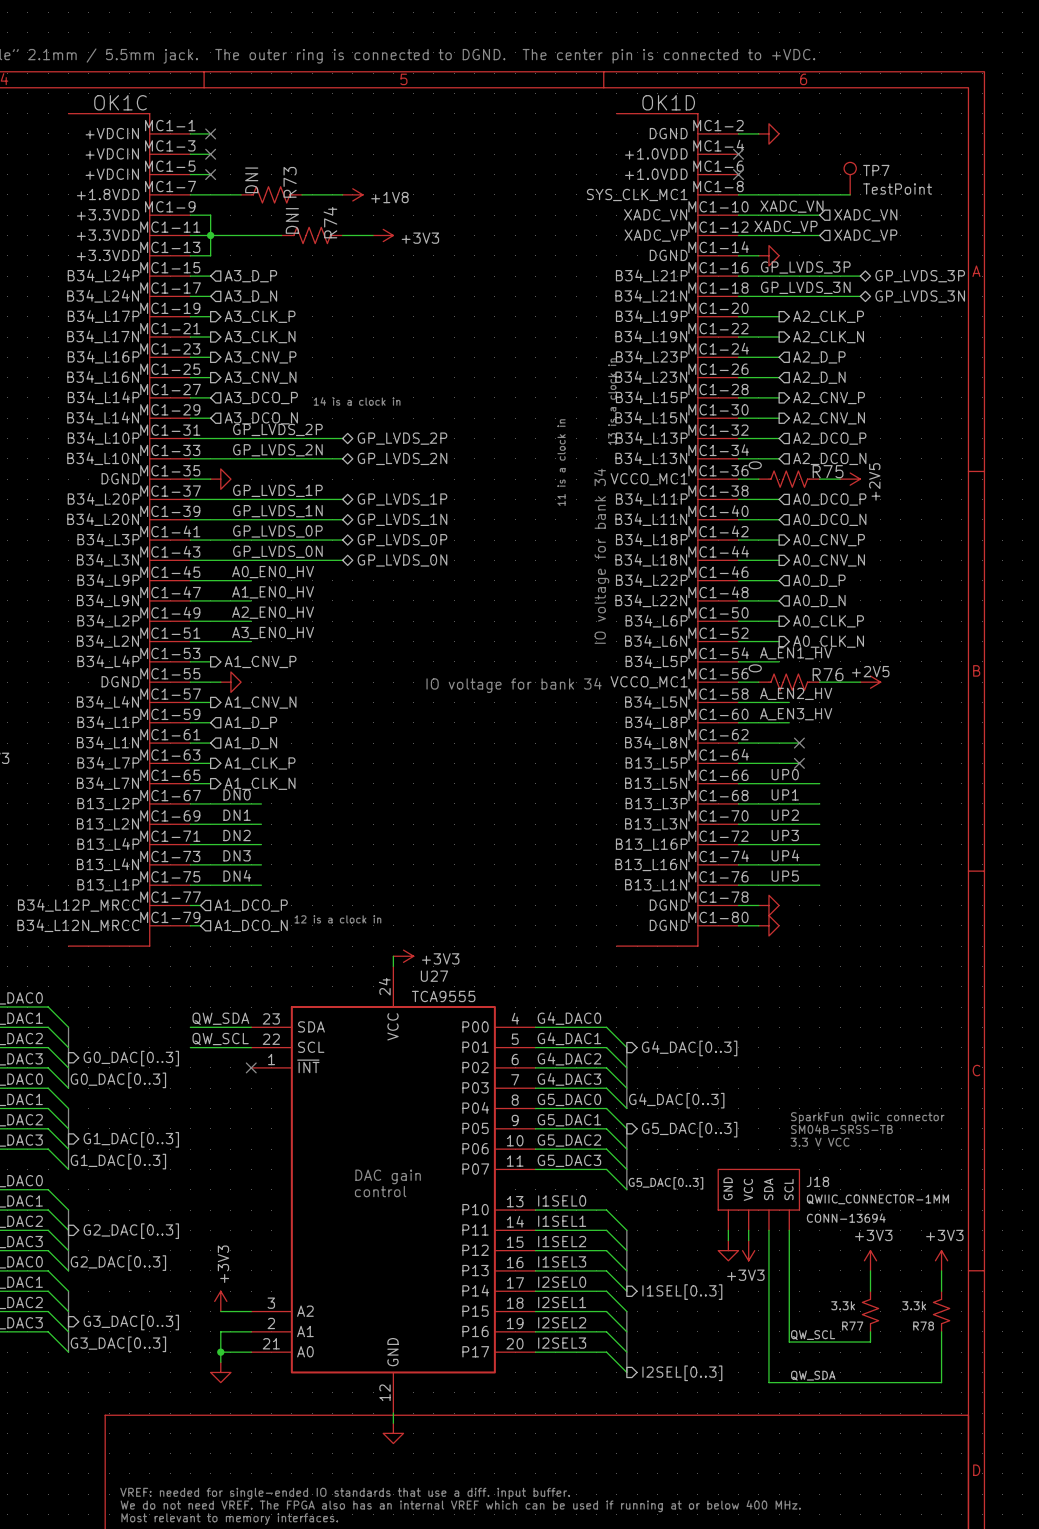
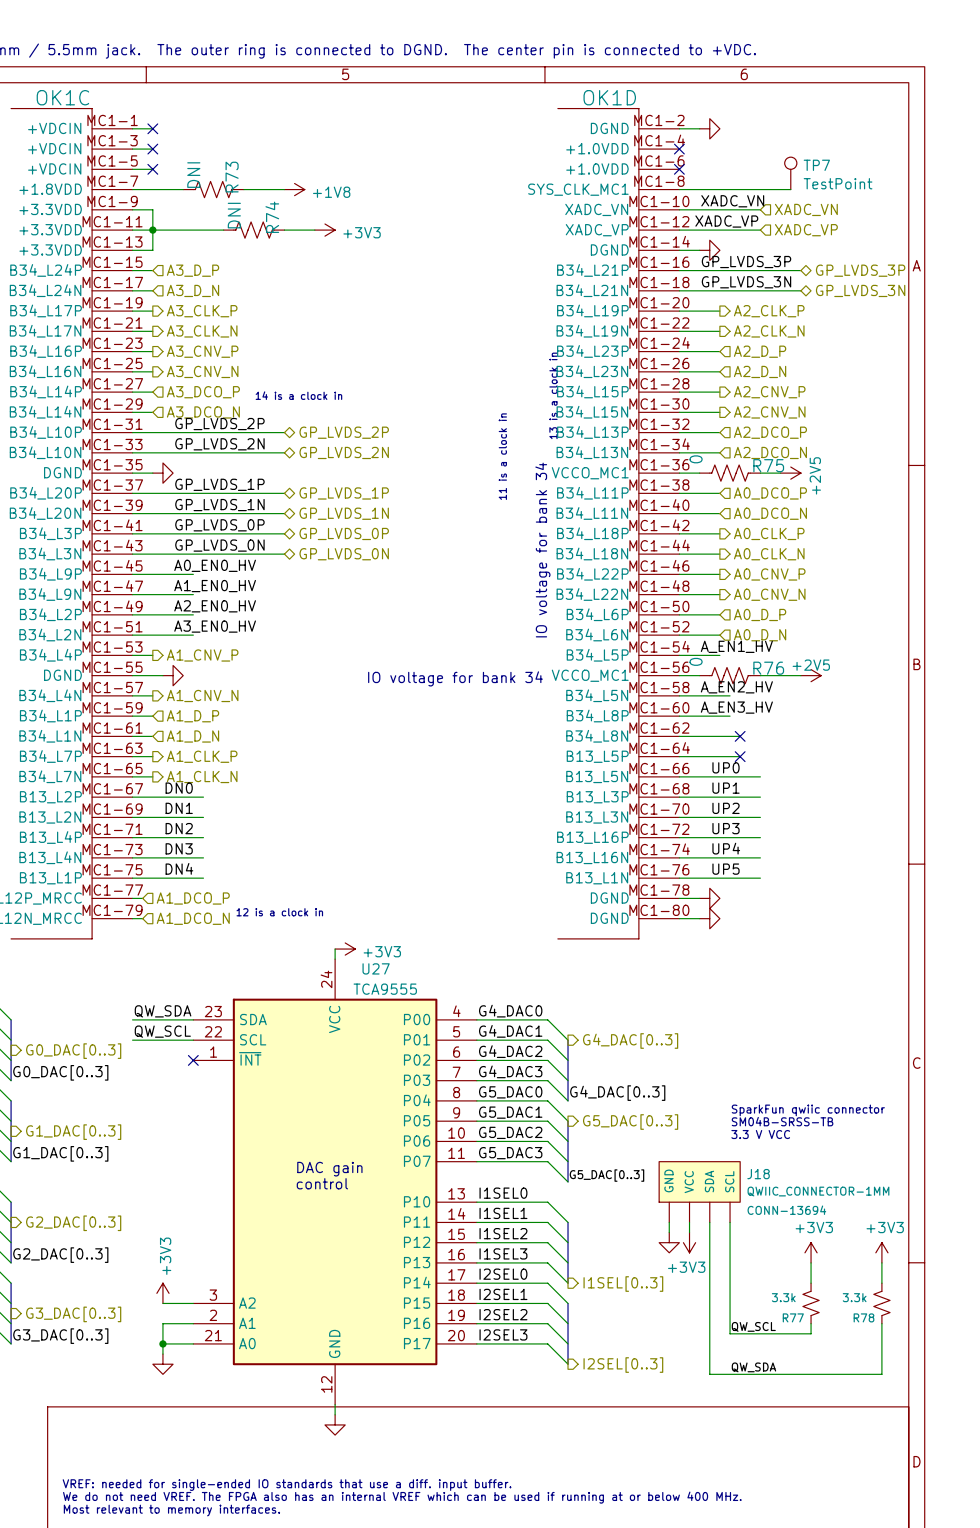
hierarchical label: A0_CNV_P (829, 540) -> A0_CLK_P (769, 533)
hierarchical label: A0_CNV_N (829, 560) -> A0_CLK_N (769, 554)
hierarchical label shape: input (819, 580) -> output (769, 574)
hierarchical label: A0_D_P (819, 580) -> A0_CNV_P (769, 574)
hierarchical label shape: input (819, 601) -> output (769, 594)
hierarchical label: A0_D_N (819, 601) -> A0_CNV_N (769, 594)
hierarchical label shape: output (828, 621) -> input (760, 614)
hierarchical label: A0_CLK_P (828, 621) -> A0_D_P (760, 614)
hierarchical label shape: output (828, 641) -> input (760, 635)
hierarchical label: A0_CLK_N (828, 641) -> A0_D_N (760, 635)

